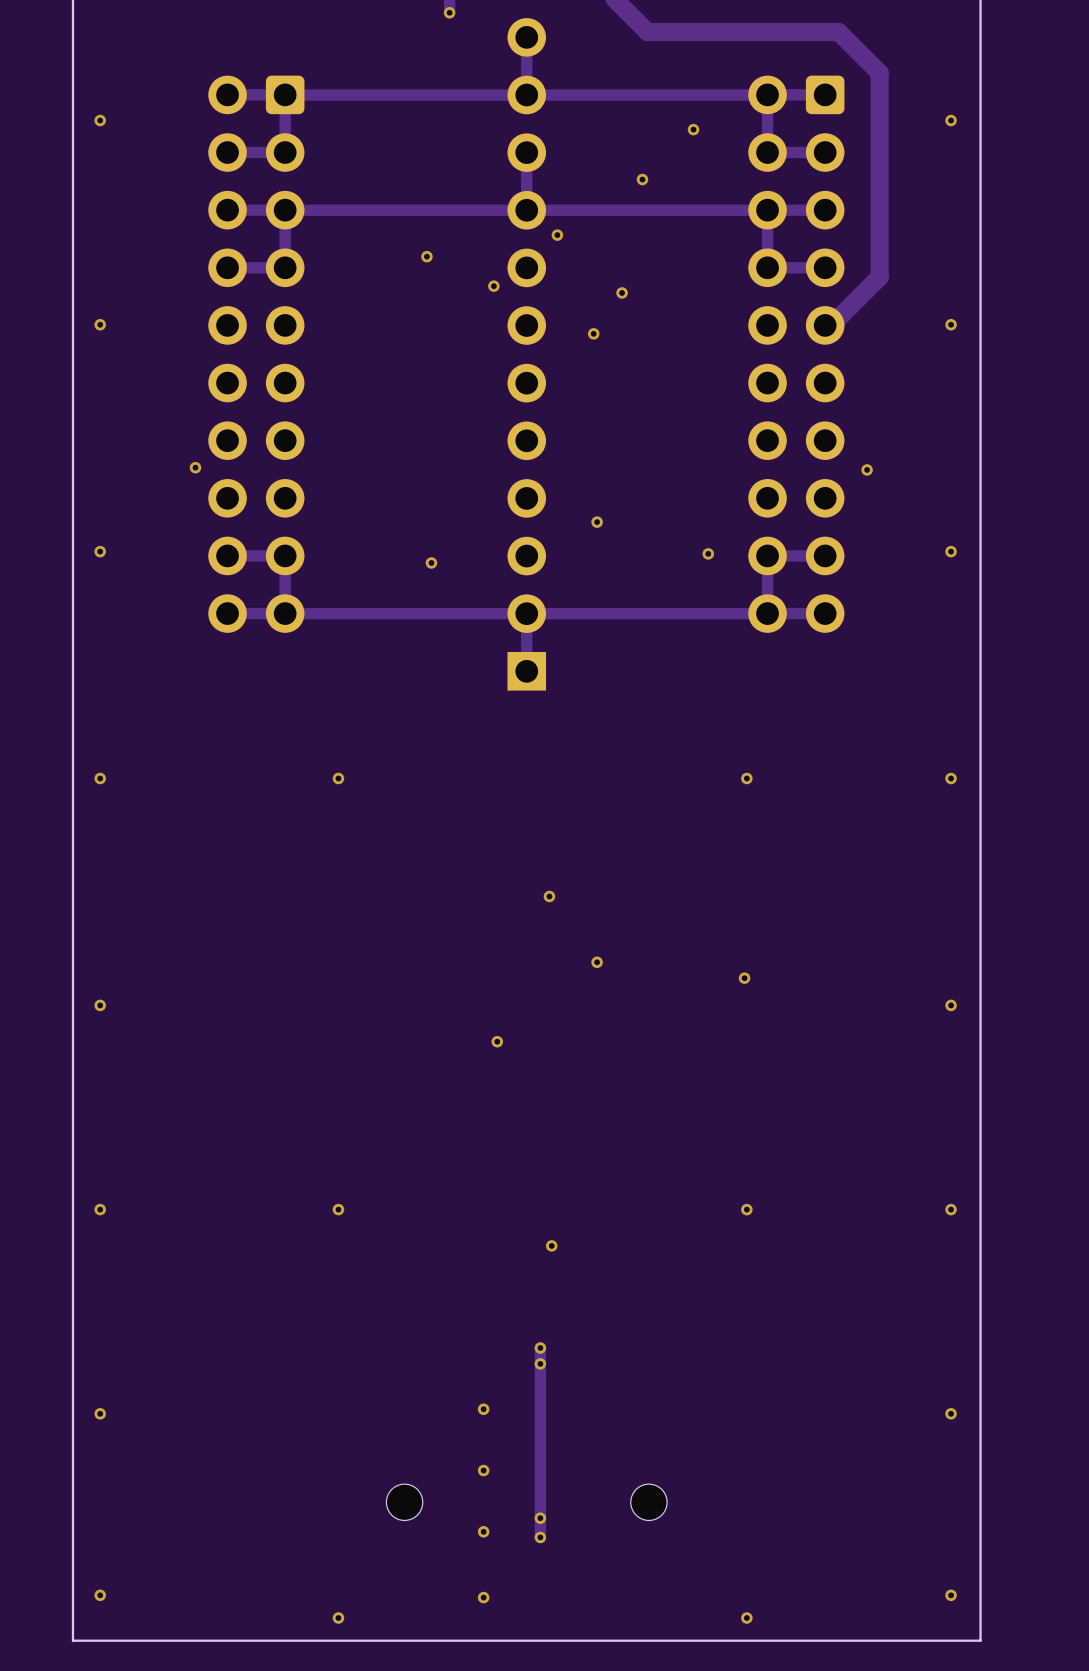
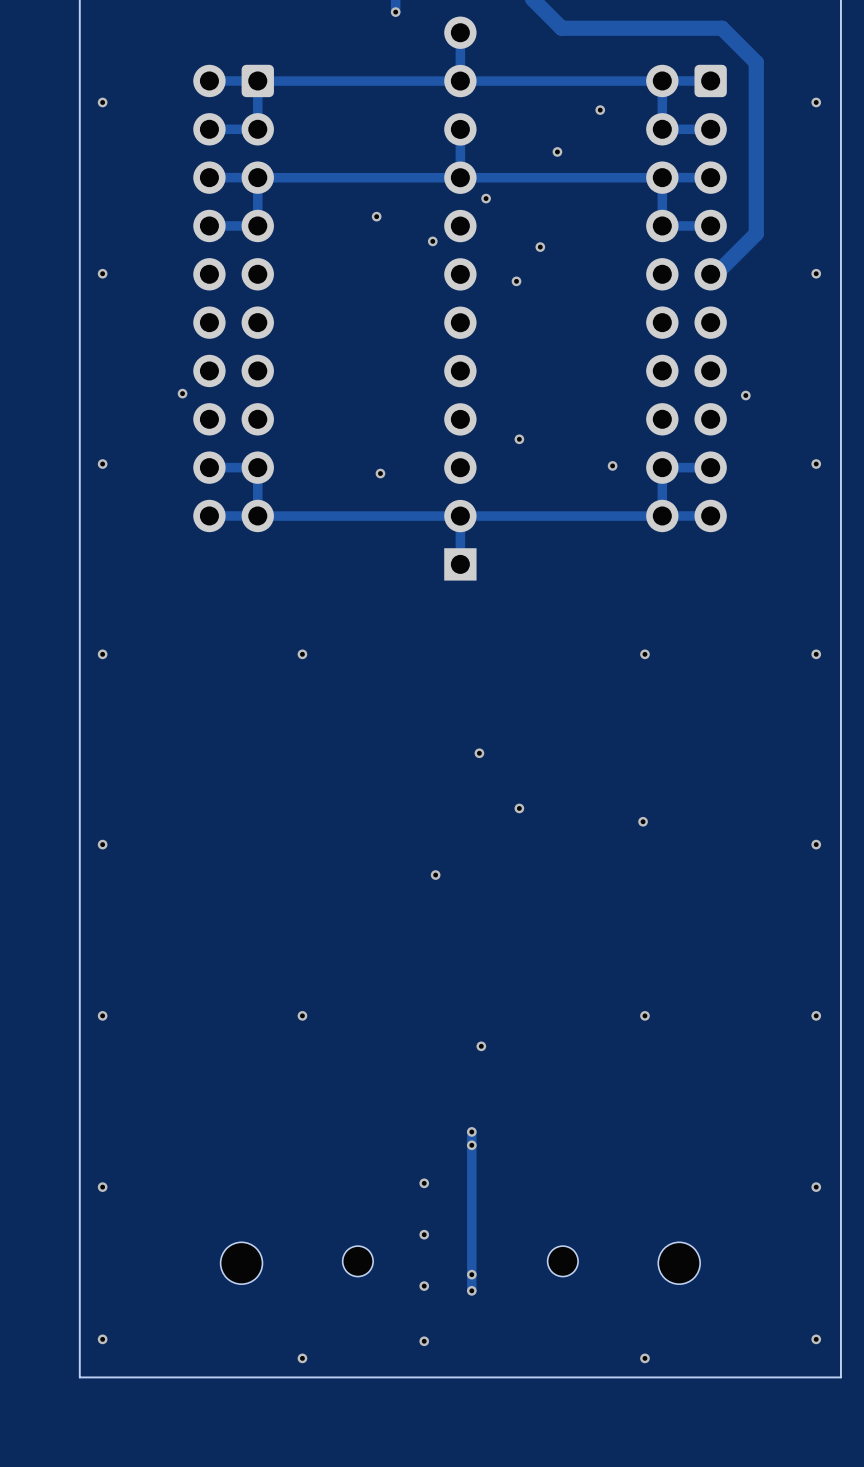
part: none -> (241, 1263)
part: none -> (679, 1263)

